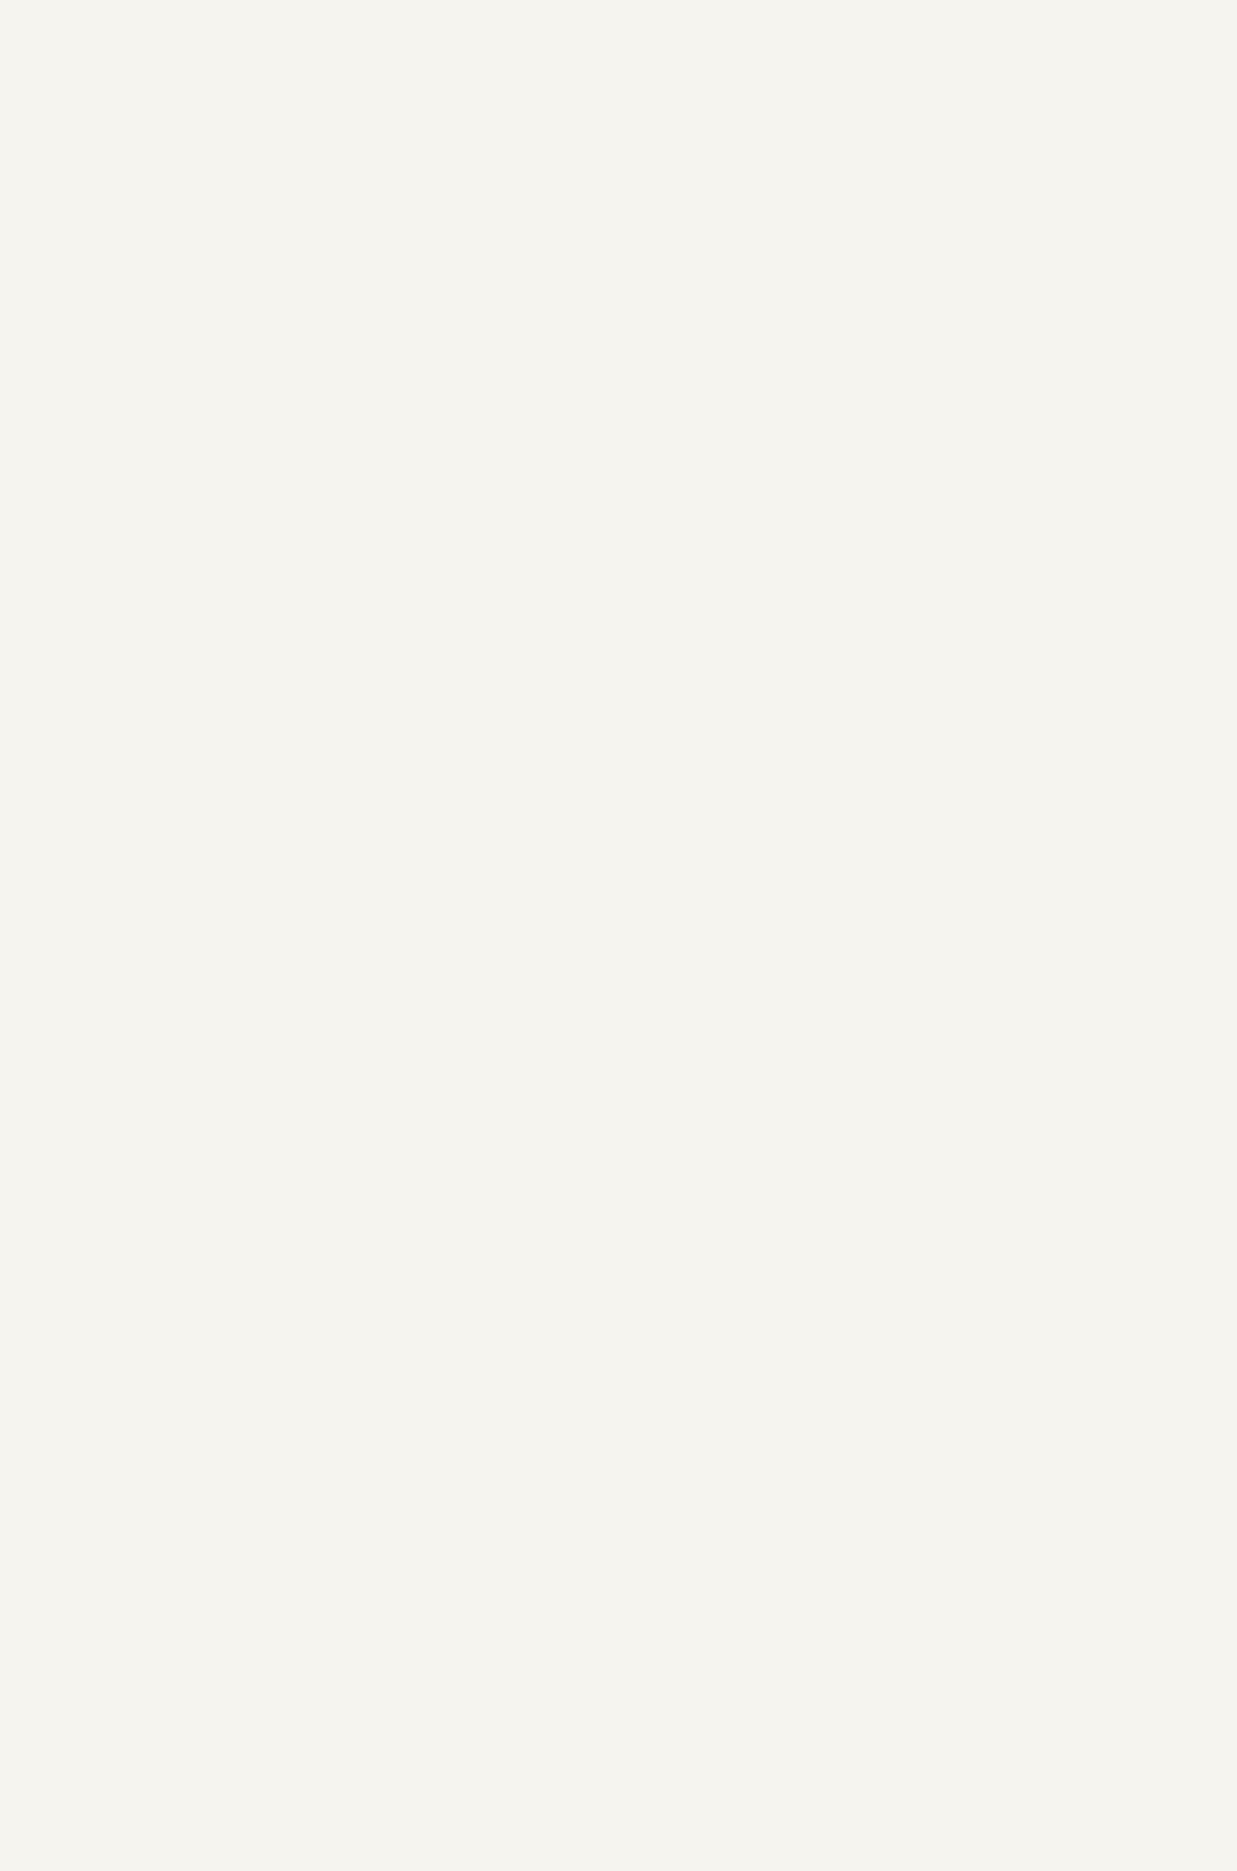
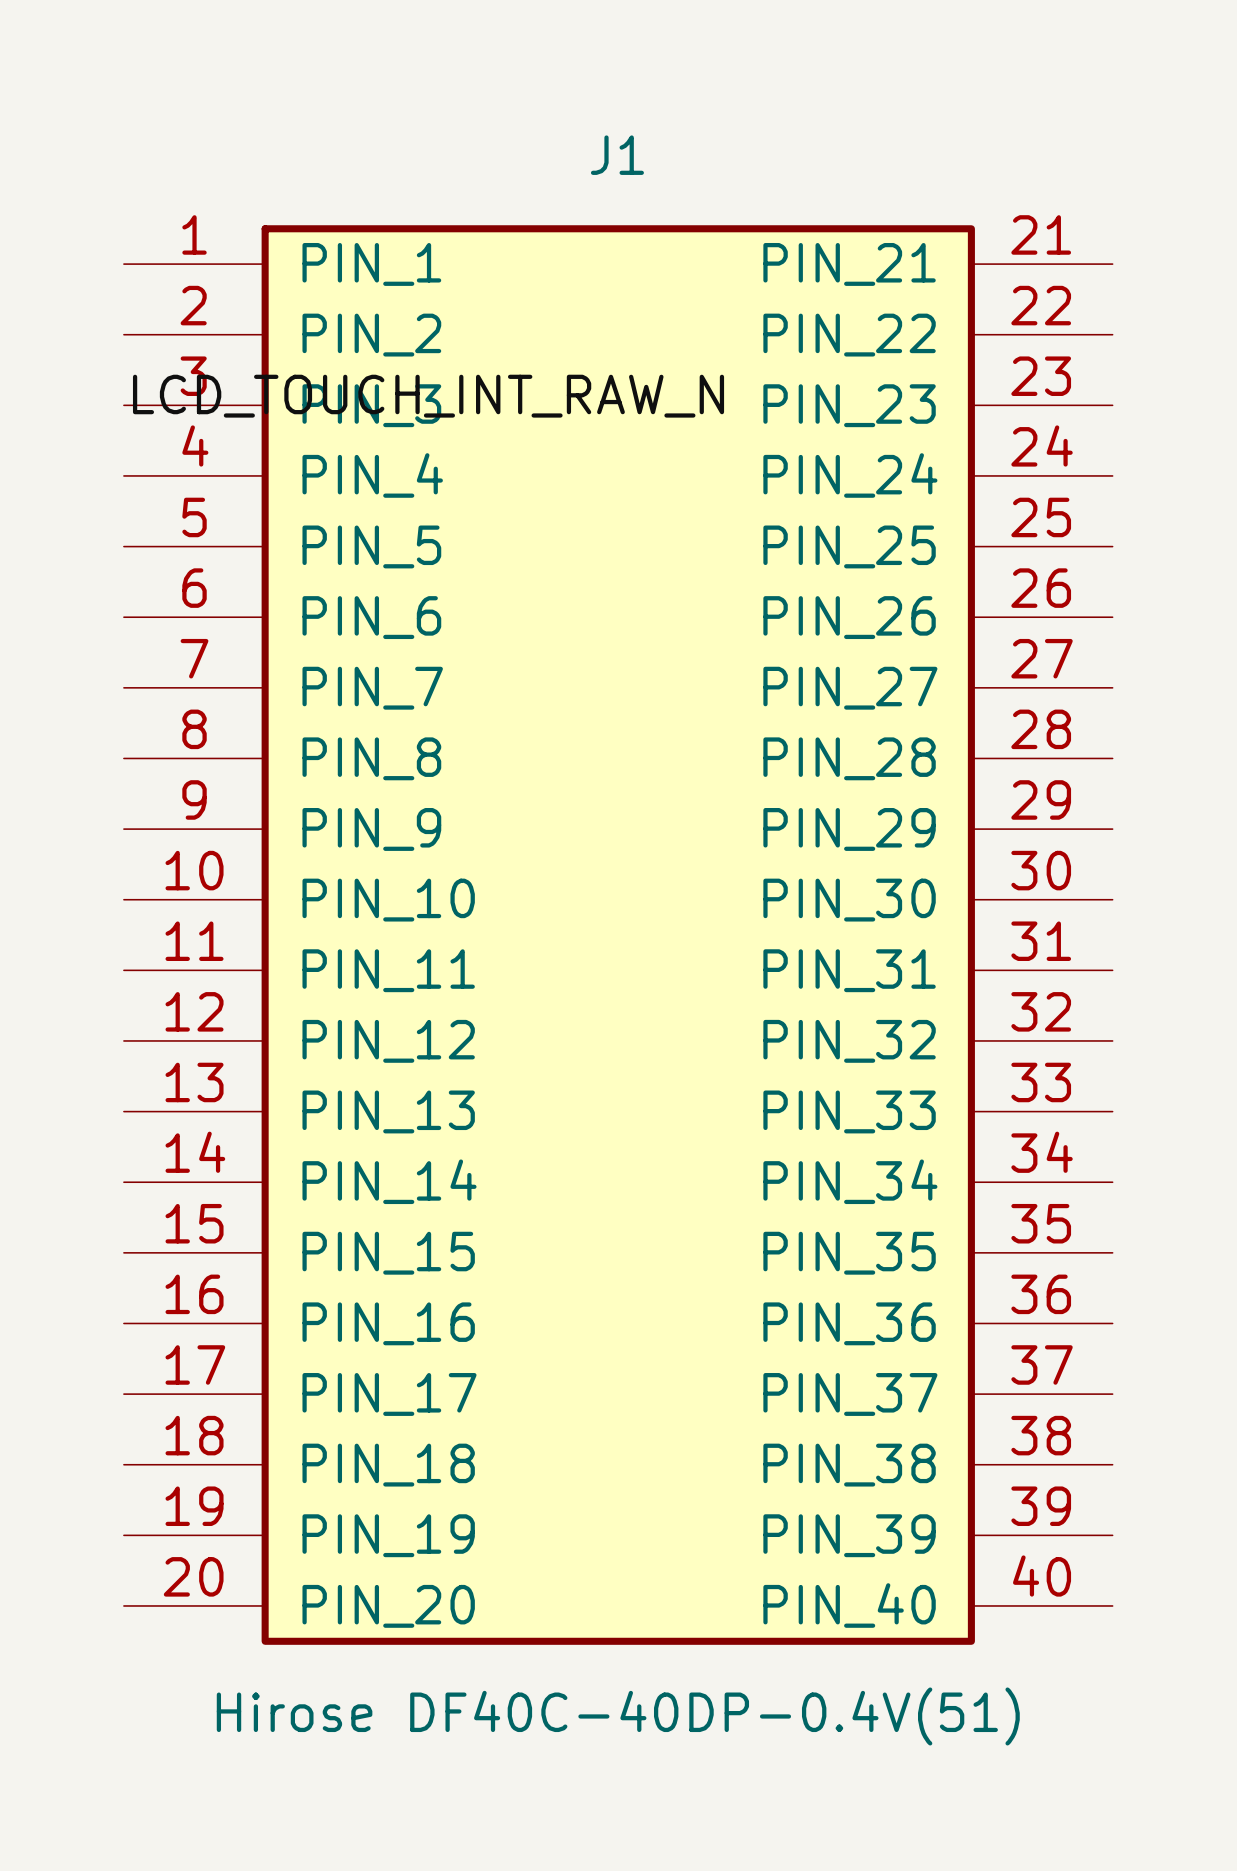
label: none -> LCD_TOUCH_INT_RAW_N (428, 396)
J1: none -> Hirose DF40C-40DP-0.4V(51) (618, 935)

